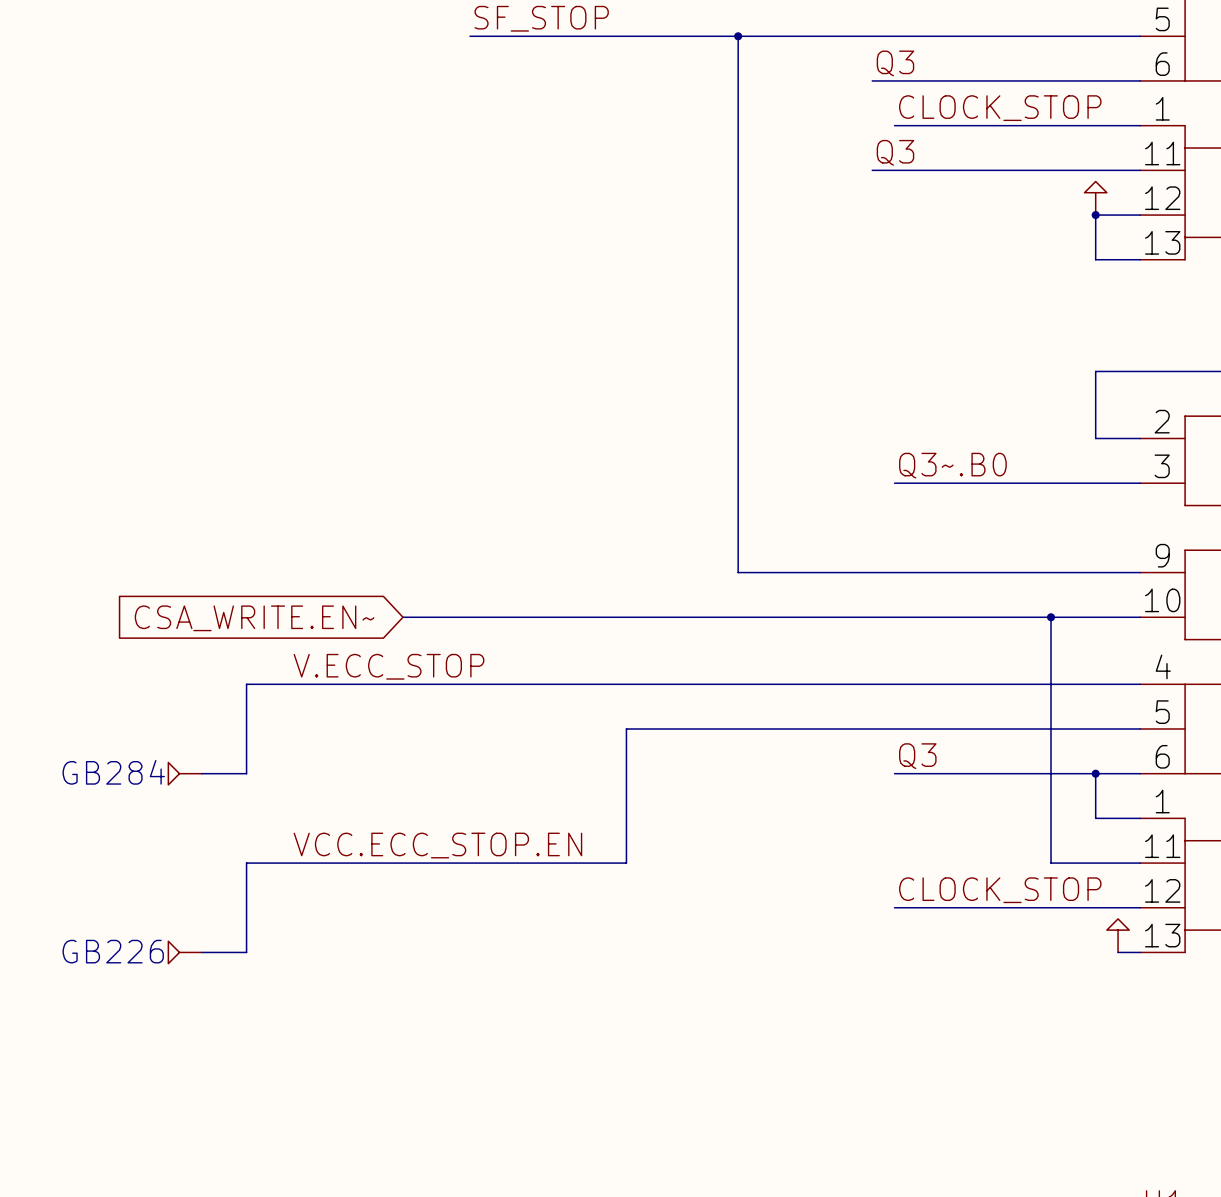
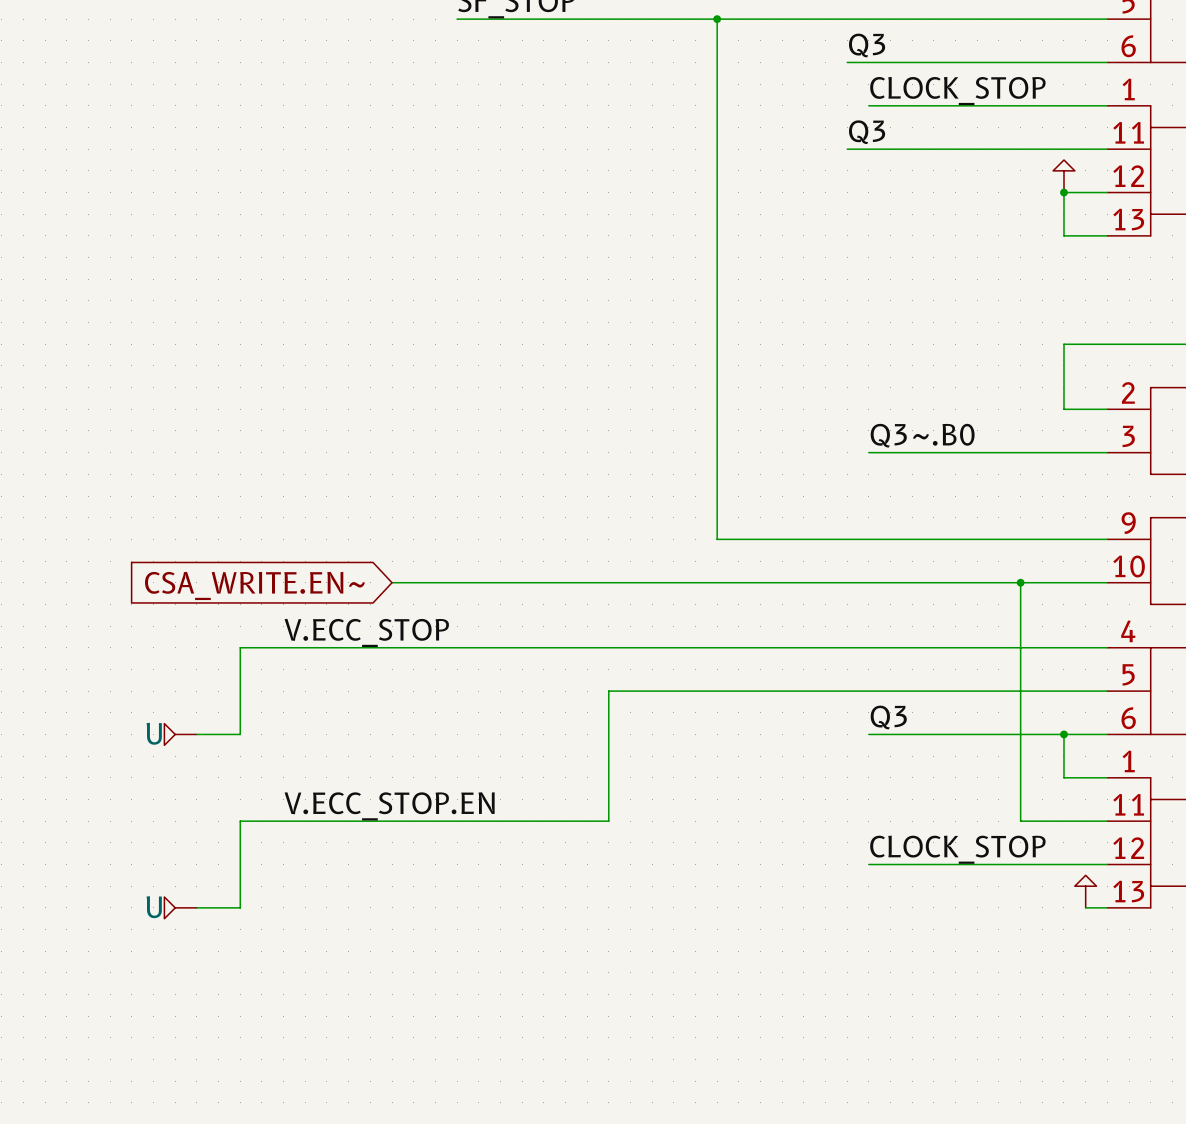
GB284 name: GB284 (113, 772) -> U (154, 733)
label: VCC.ECC_STOP.EN (437, 845) -> V.ECC_STOP.EN (389, 806)
GB226 name: GB226 (113, 951) -> U (154, 907)

